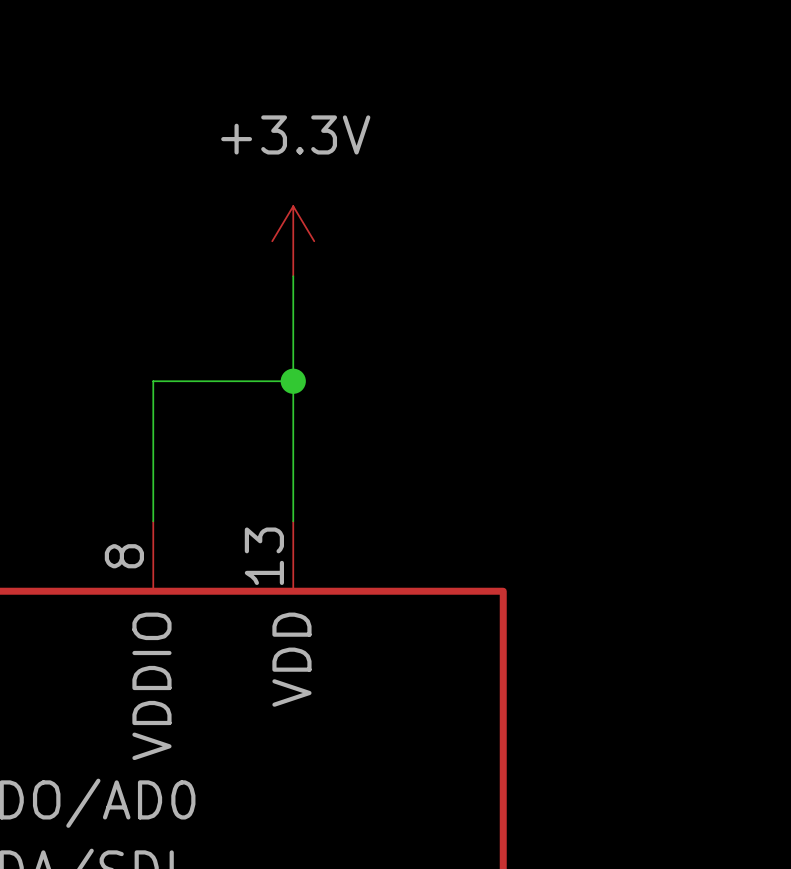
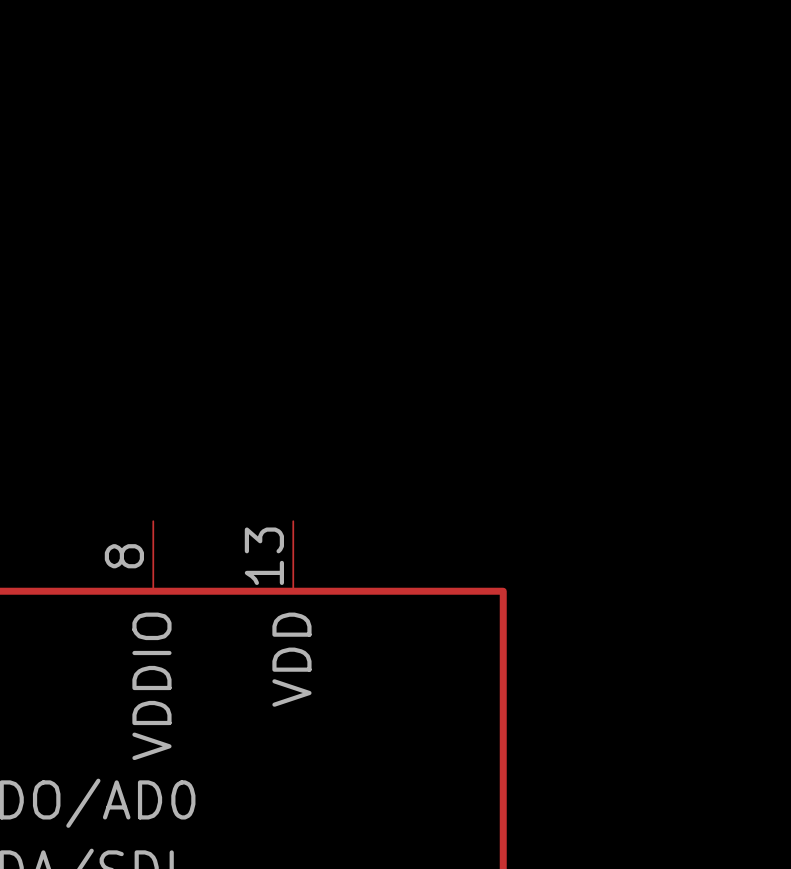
power symbol: +3.3V (293, 241) -> none
wire: (293, 276) (293, 521) -> none
wire: (293, 381) (153, 381) (153, 521) -> none
junction: (293, 381) -> none

